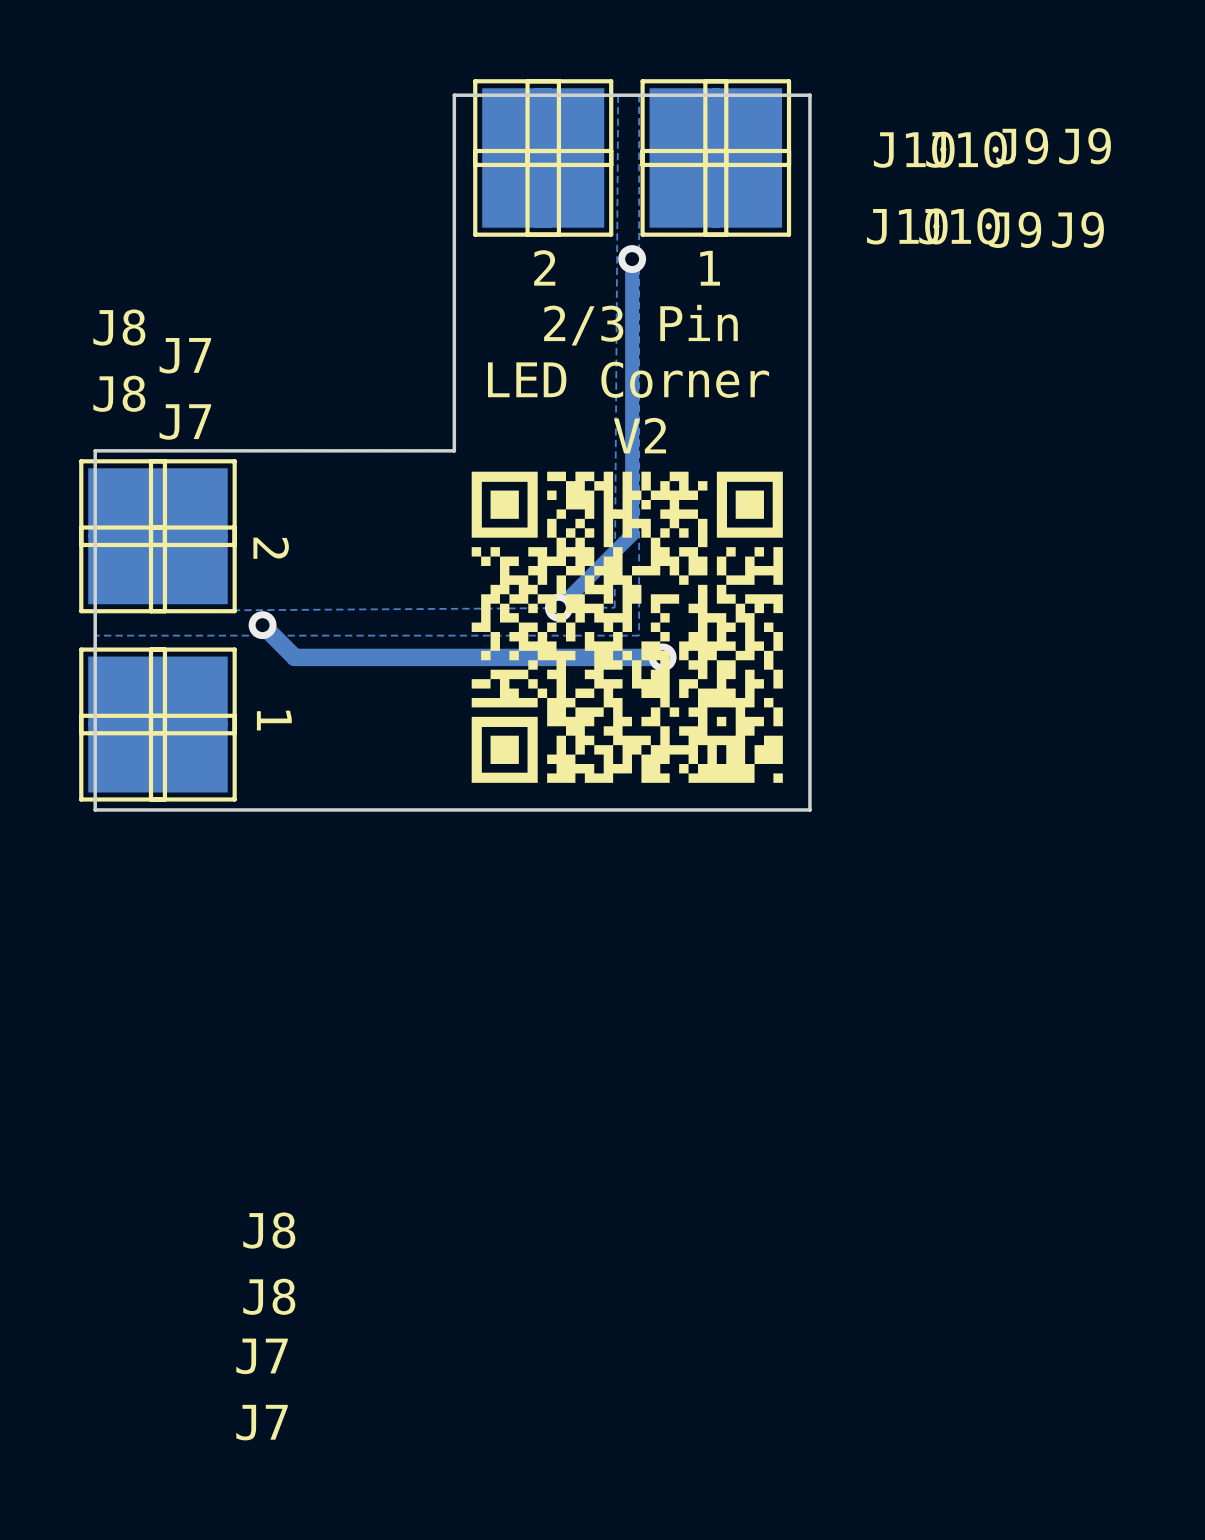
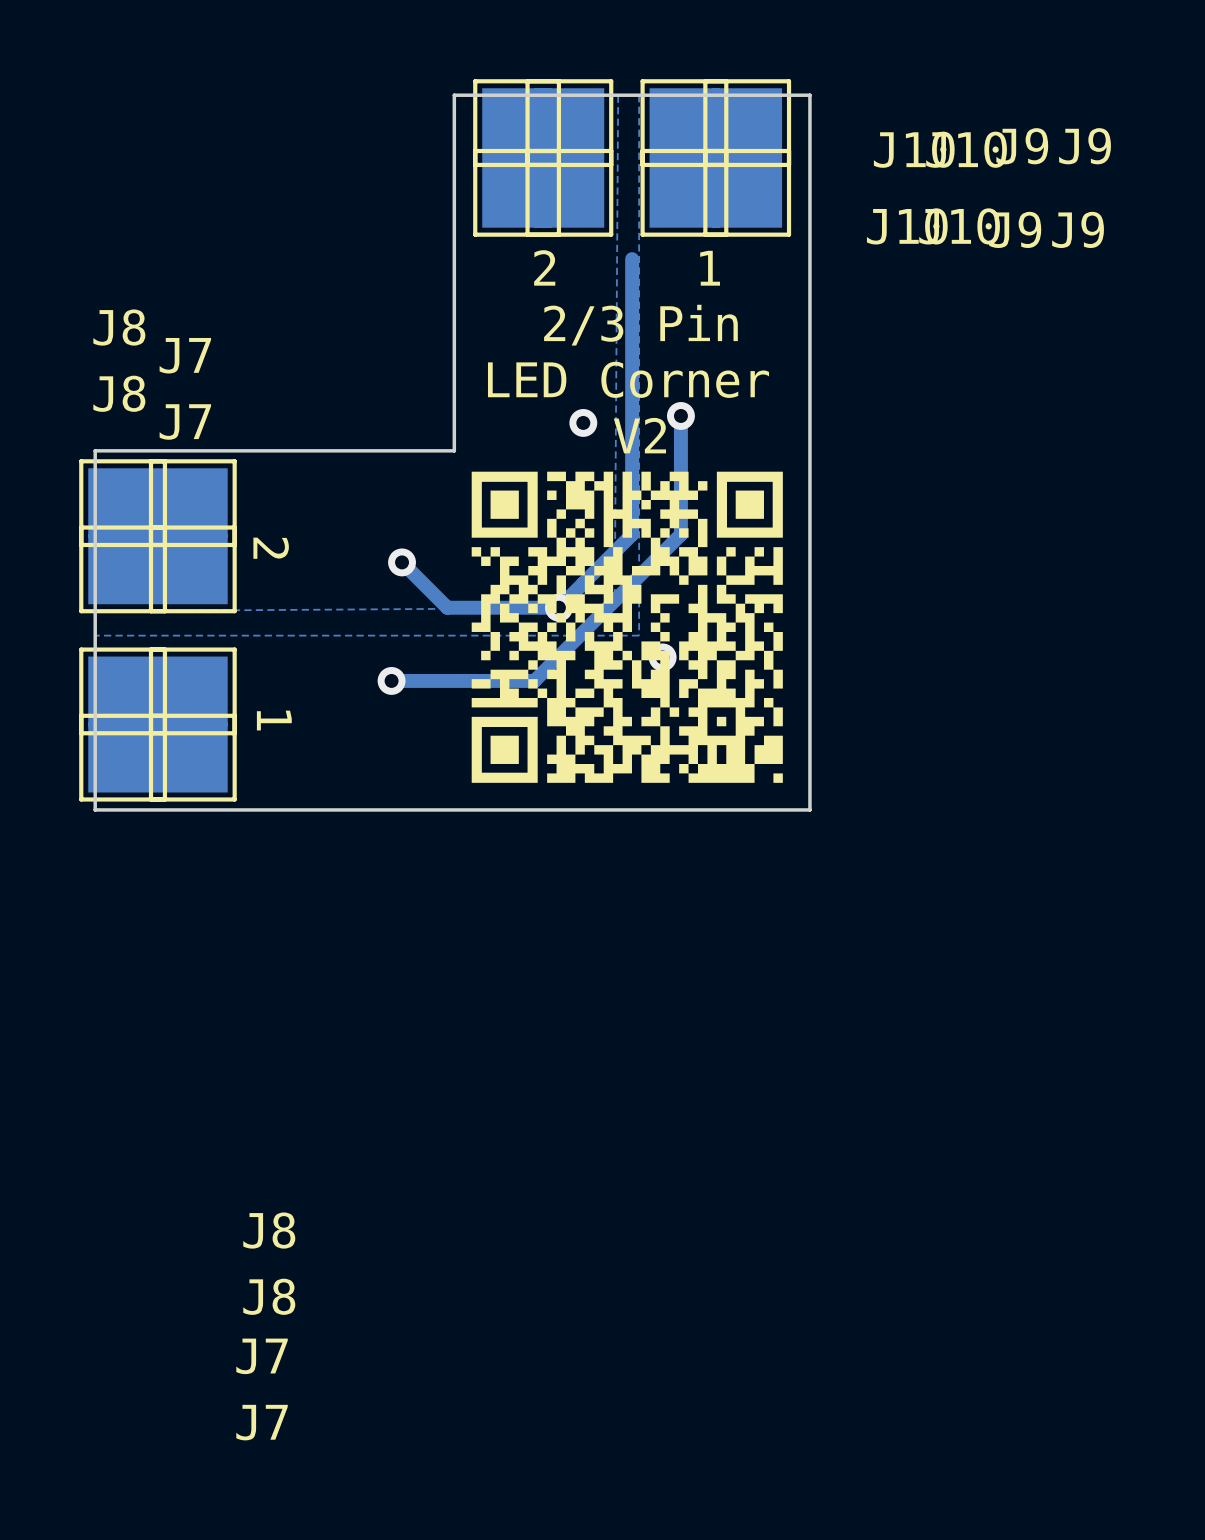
via: (632, 259) -> none
track: none -> (680, 415) (680, 534) (534, 680) (391, 680)
via: none -> (680, 415)
via: none -> (583, 422)
track: none -> (402, 562) (447, 607) (558, 607)
via: none -> (402, 562)
track: (262, 625) (294, 657) (662, 657) -> none
via: (262, 625) -> none
via: none -> (391, 680)

